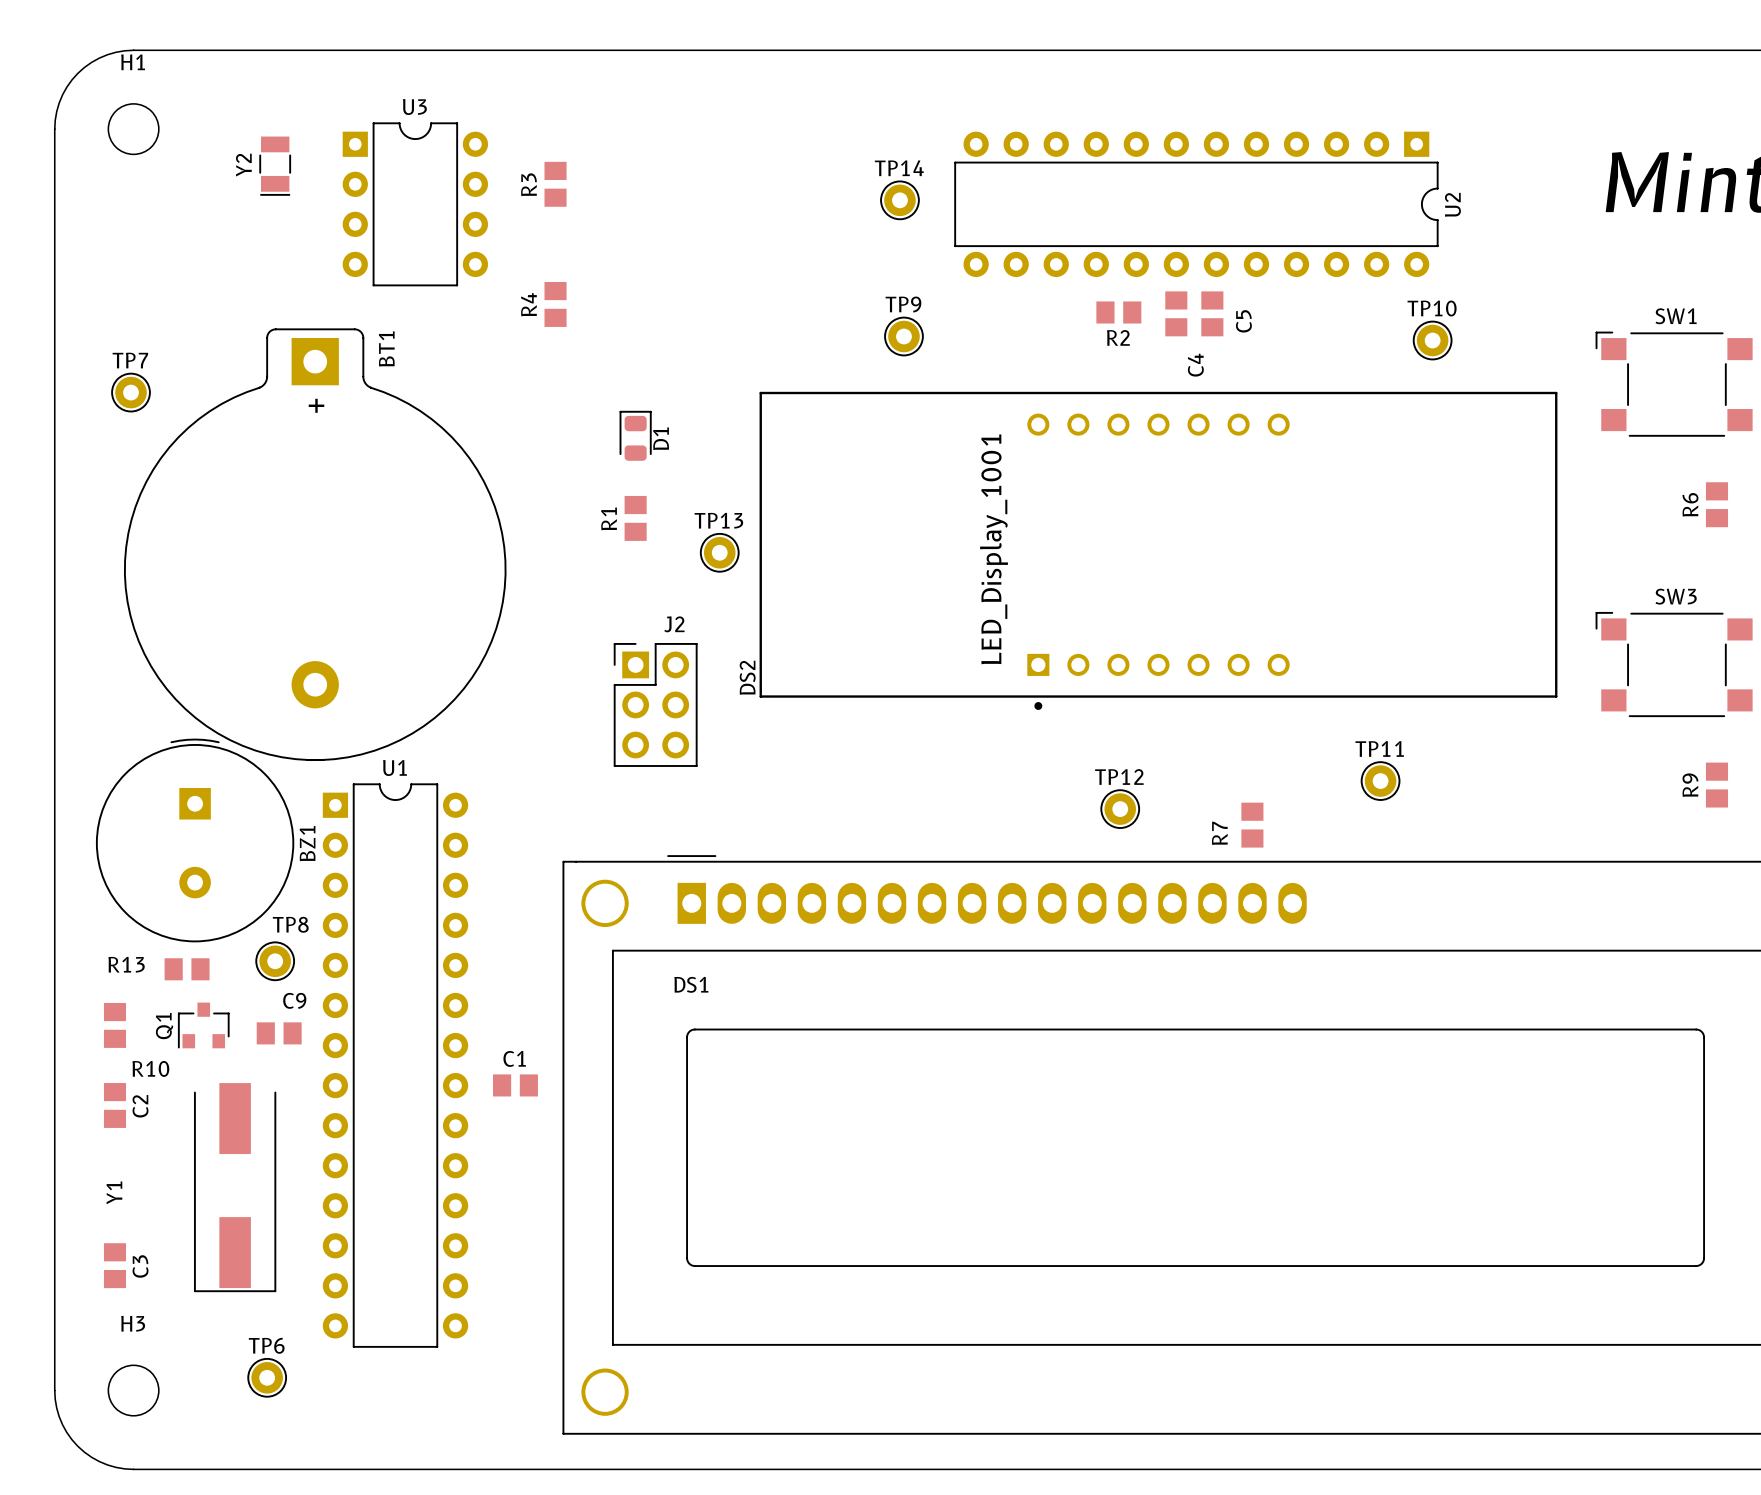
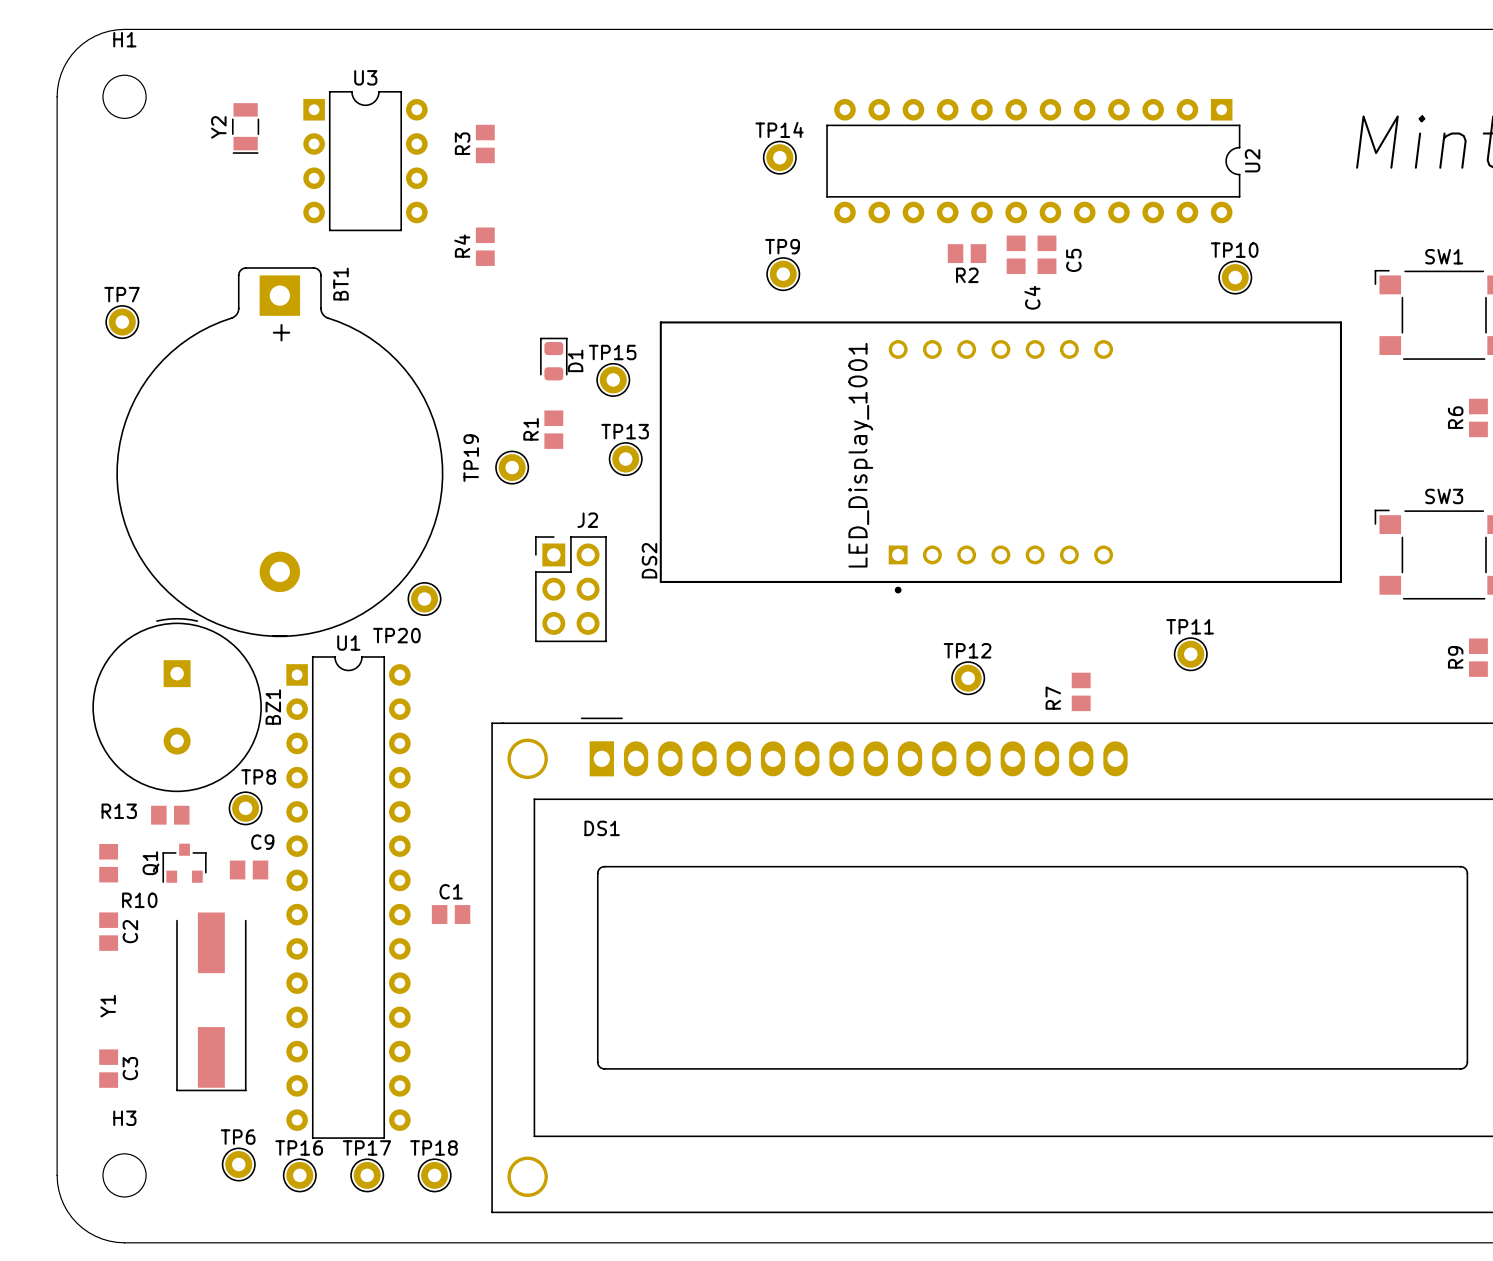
TP15: none -> (613, 379)
TP19: none -> (512, 467)
TP20: none -> (424, 599)
TP16: none -> (299, 1175)
TP17: none -> (367, 1175)
TP18: none -> (434, 1175)

